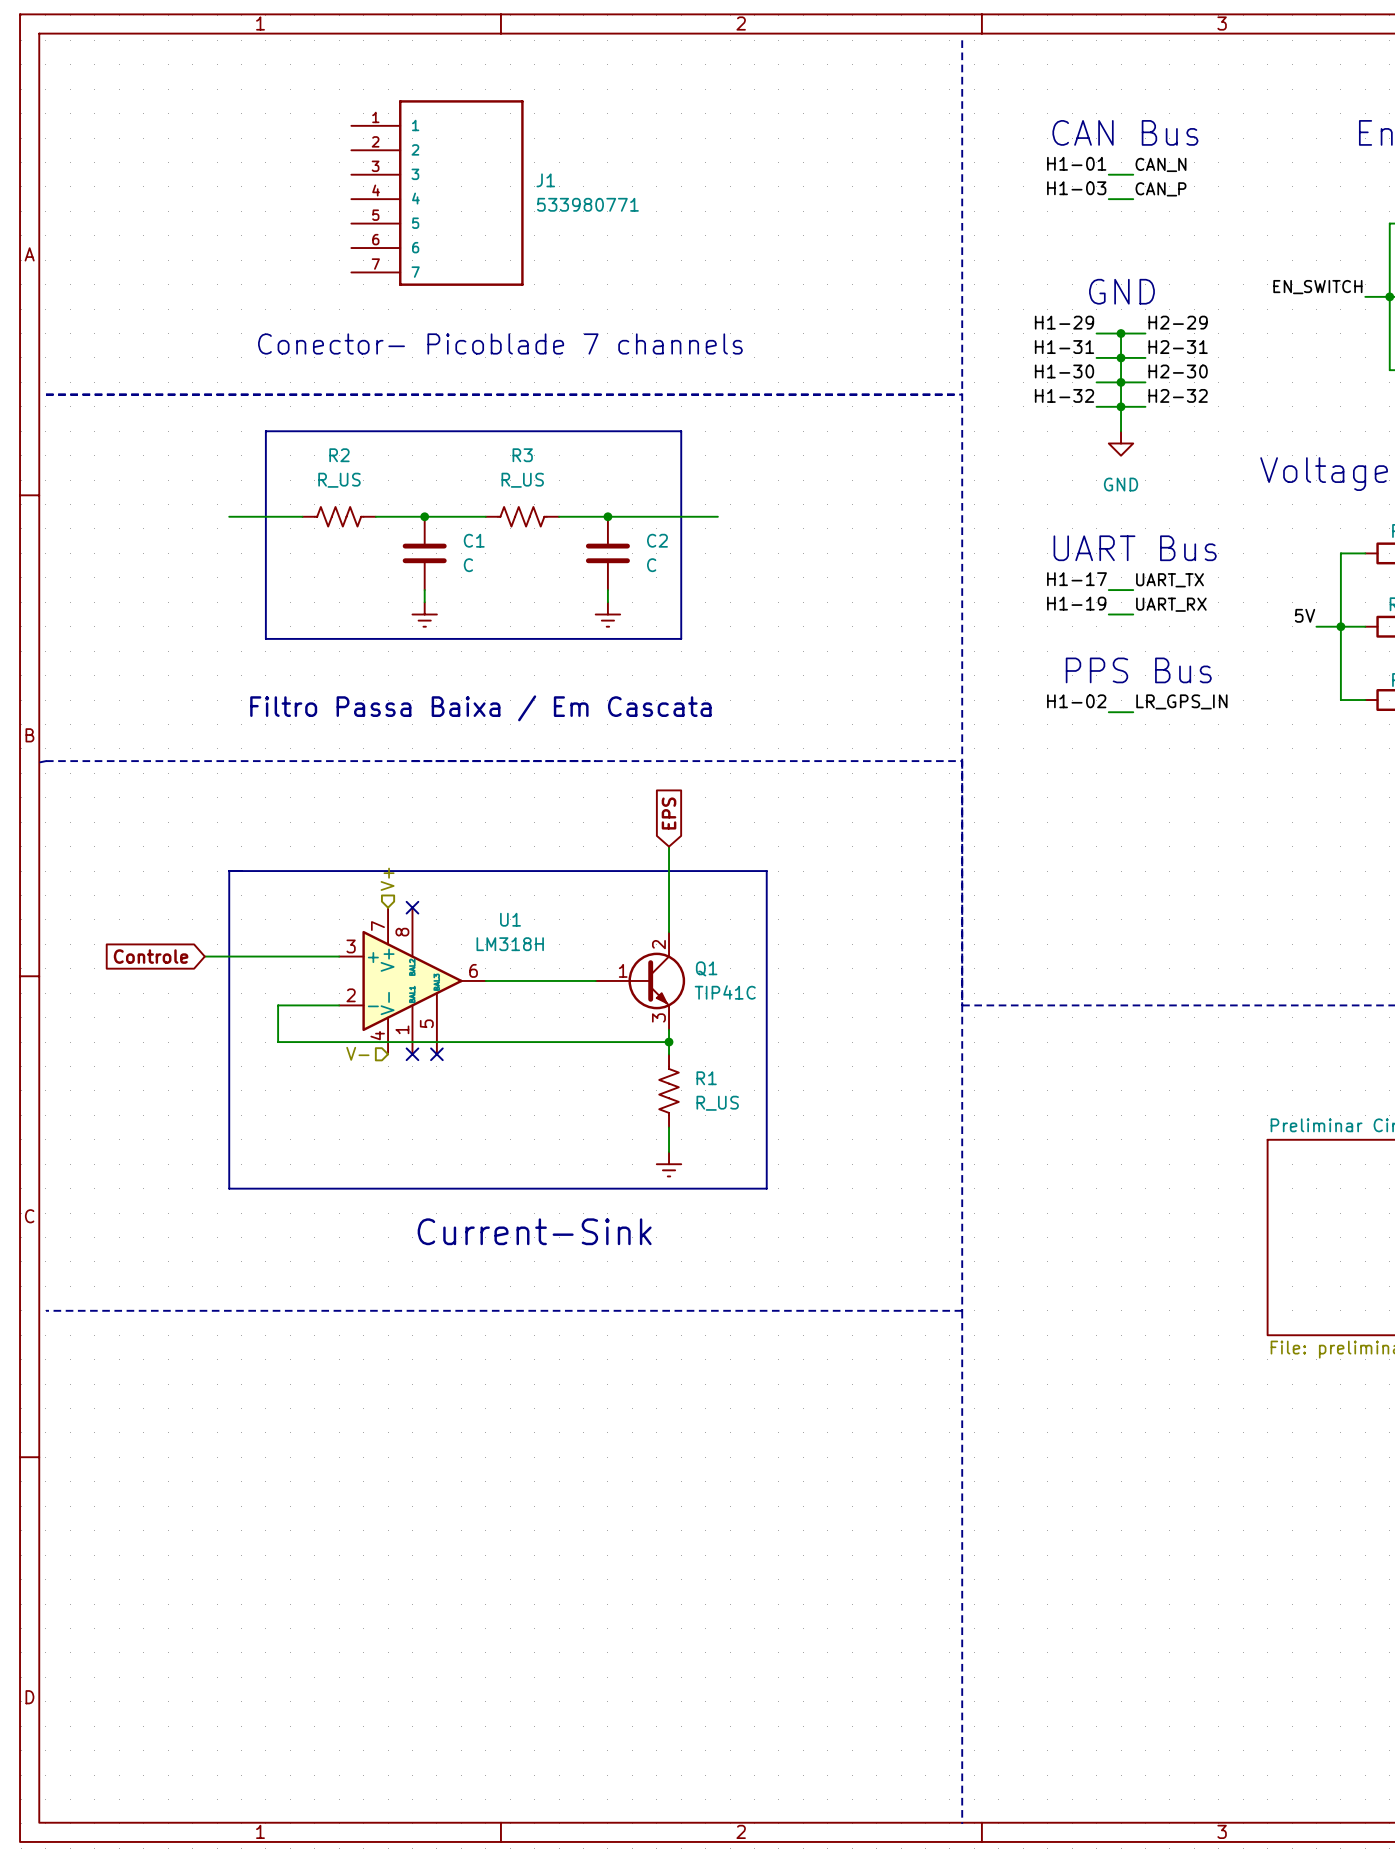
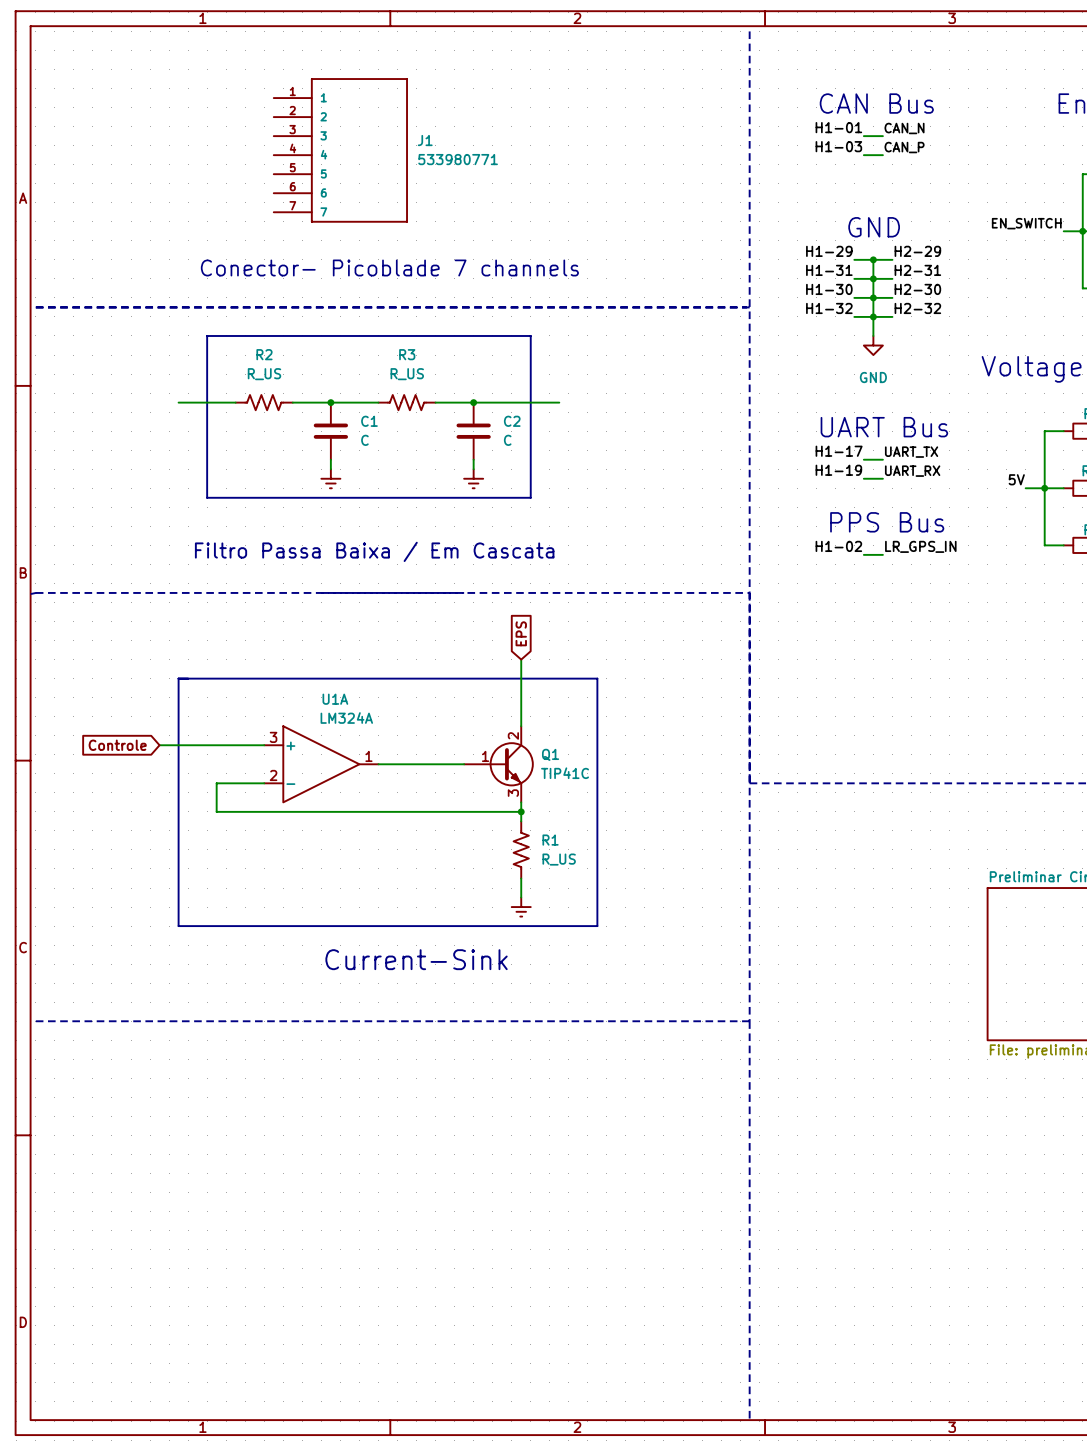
hierarchical label: V+ (387, 879) -> none
no-connect mark: (412, 907) -> none
U1: LM318H (412, 980) -> none
U1A: none -> LM324A (321, 764)
hierarchical label: V- (357, 1053) -> none
no-connect mark: (412, 1054) -> none
no-connect mark: (436, 1054) -> none

